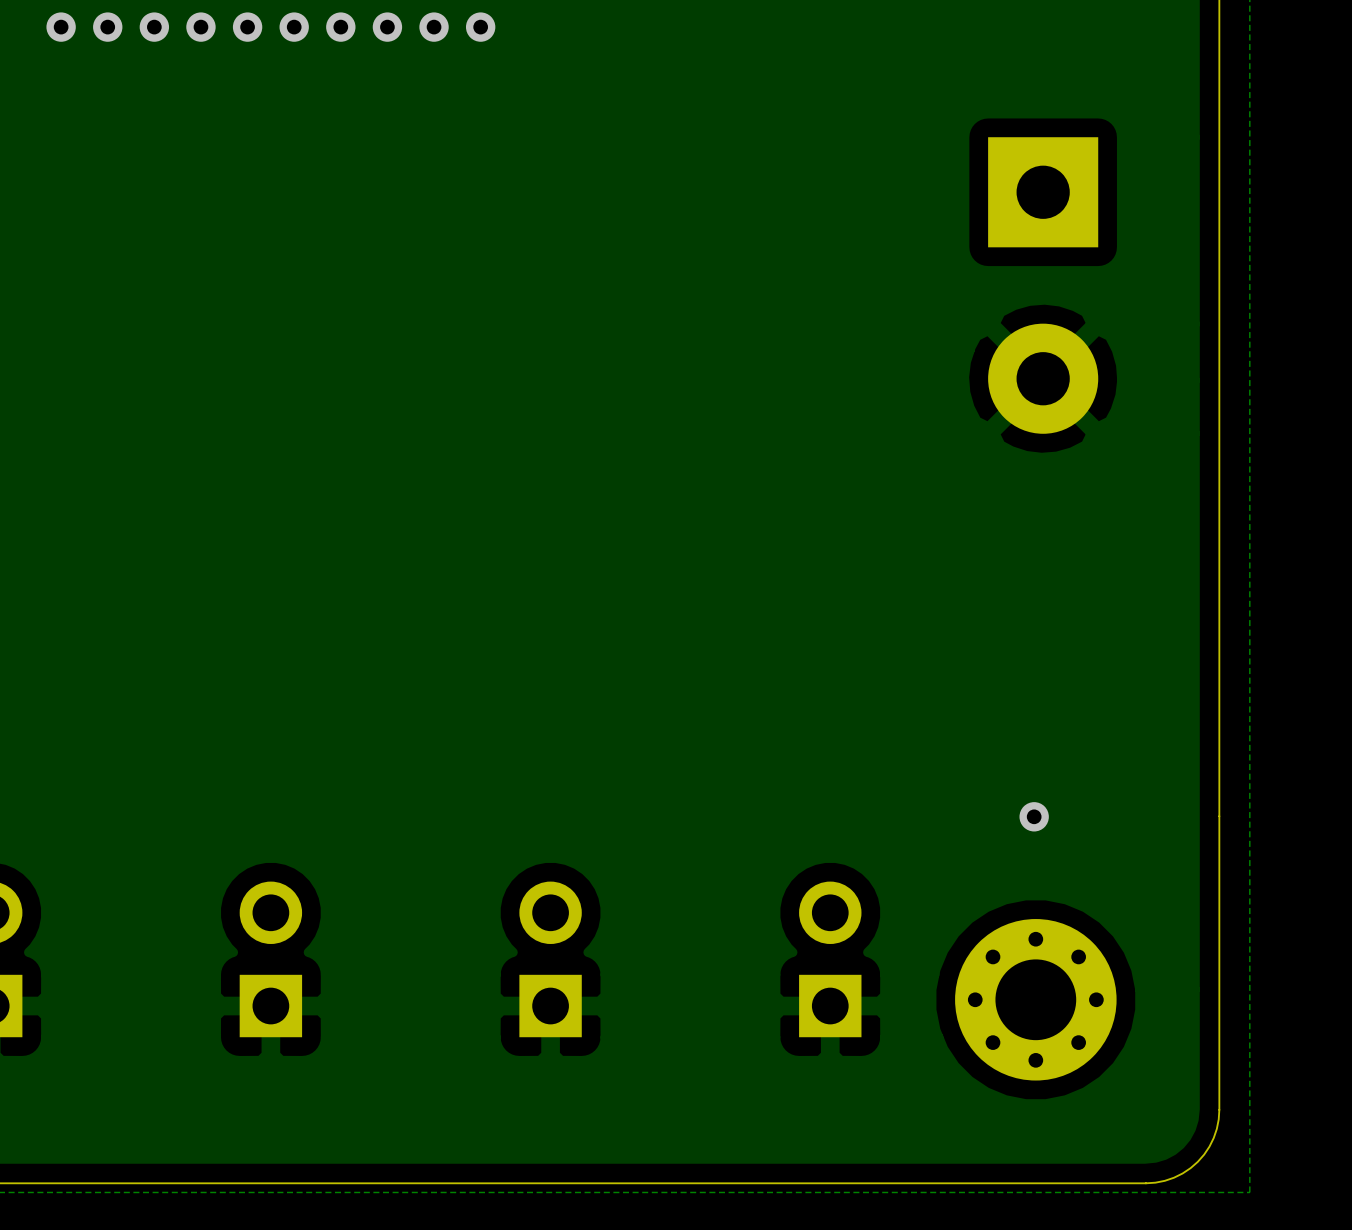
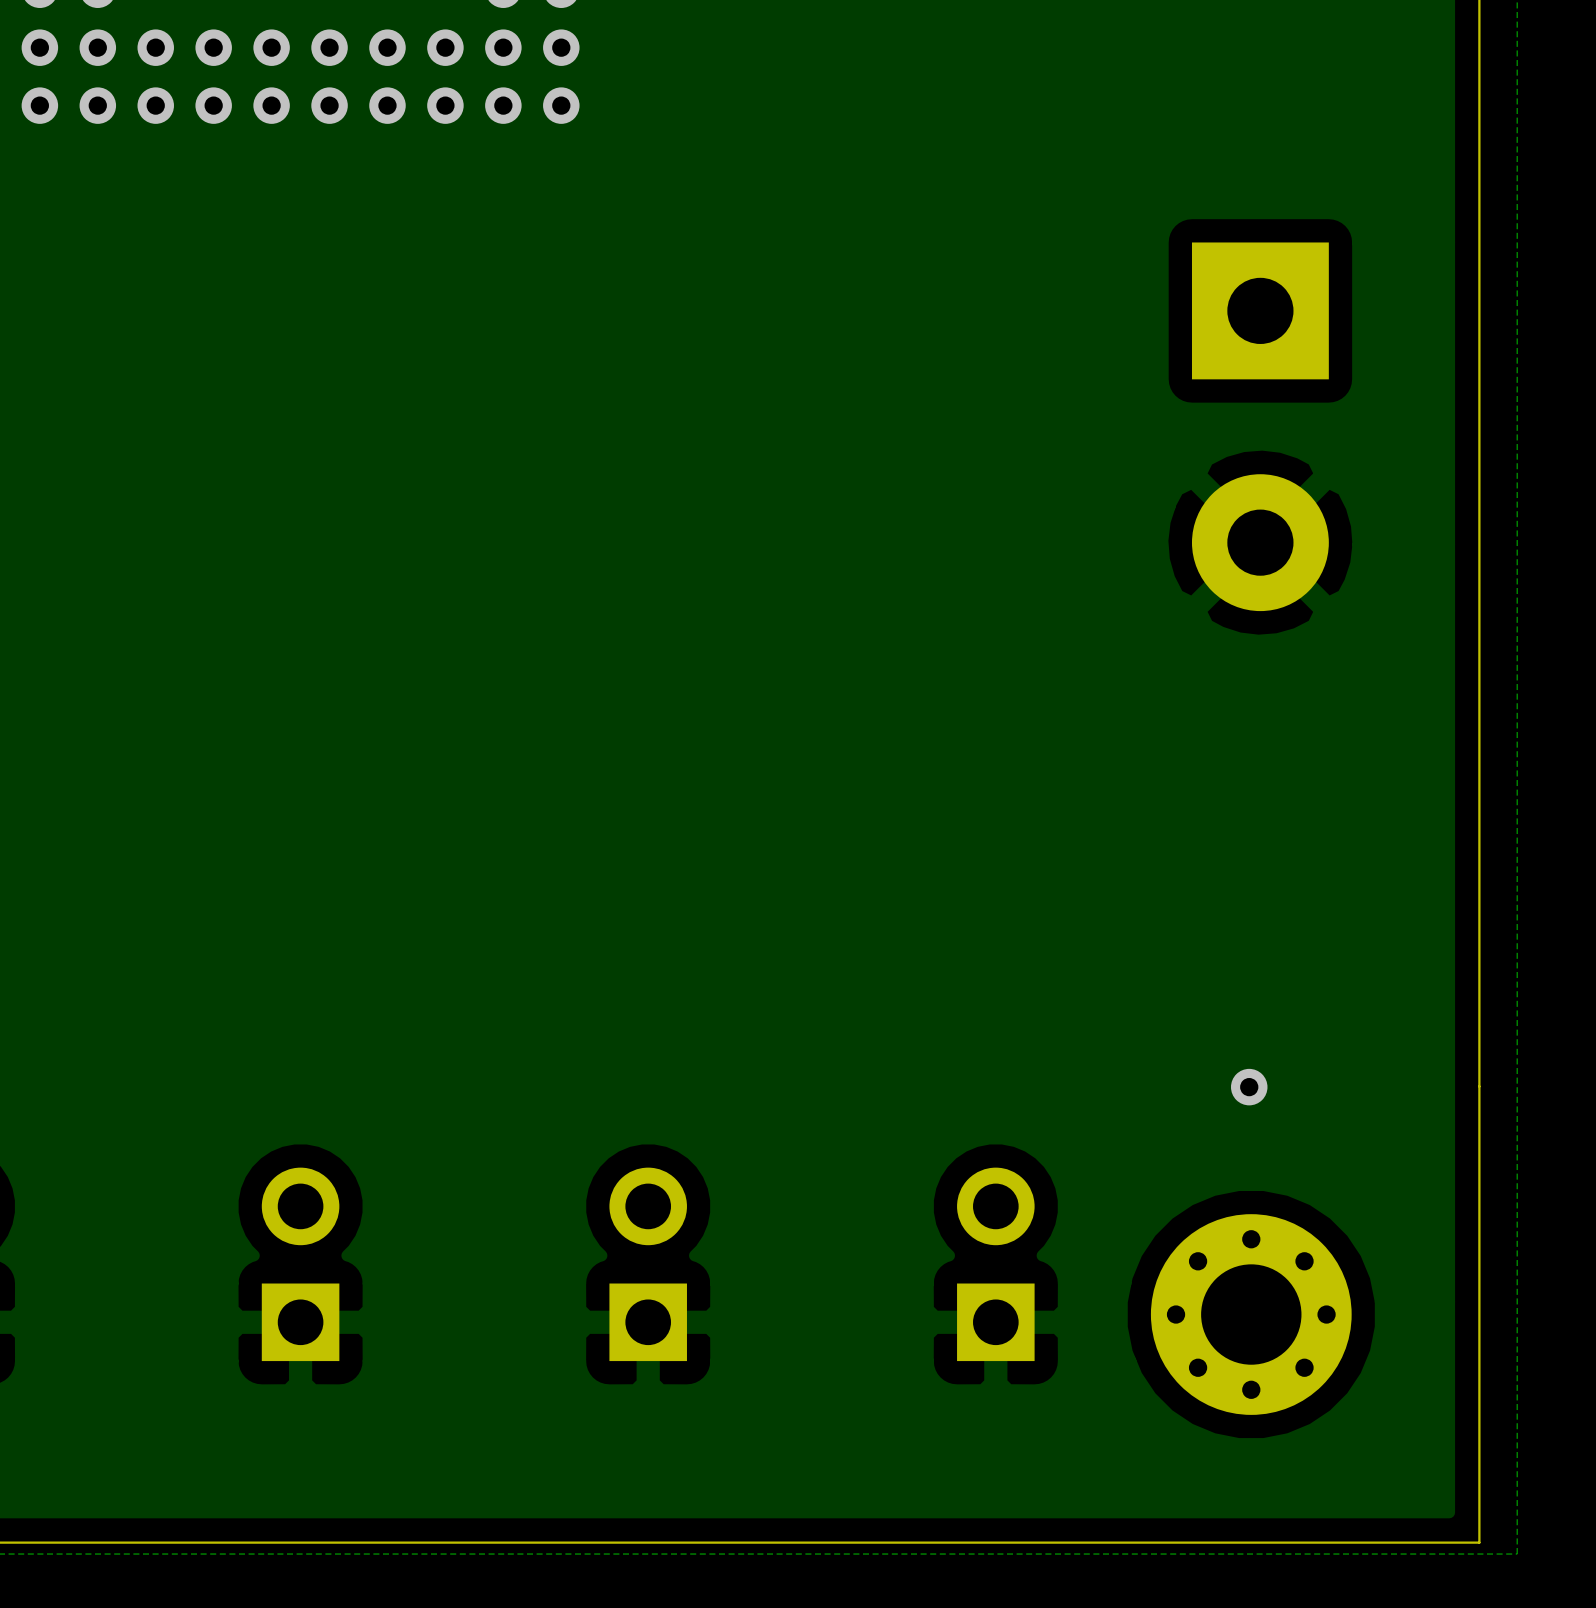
board edge: (1219, 1109) (1213, 1137) (1197, 1161) (1174, 1177) (1145, 1183) -> (1479, 1451) (1479, 1542) (1388, 1542)

